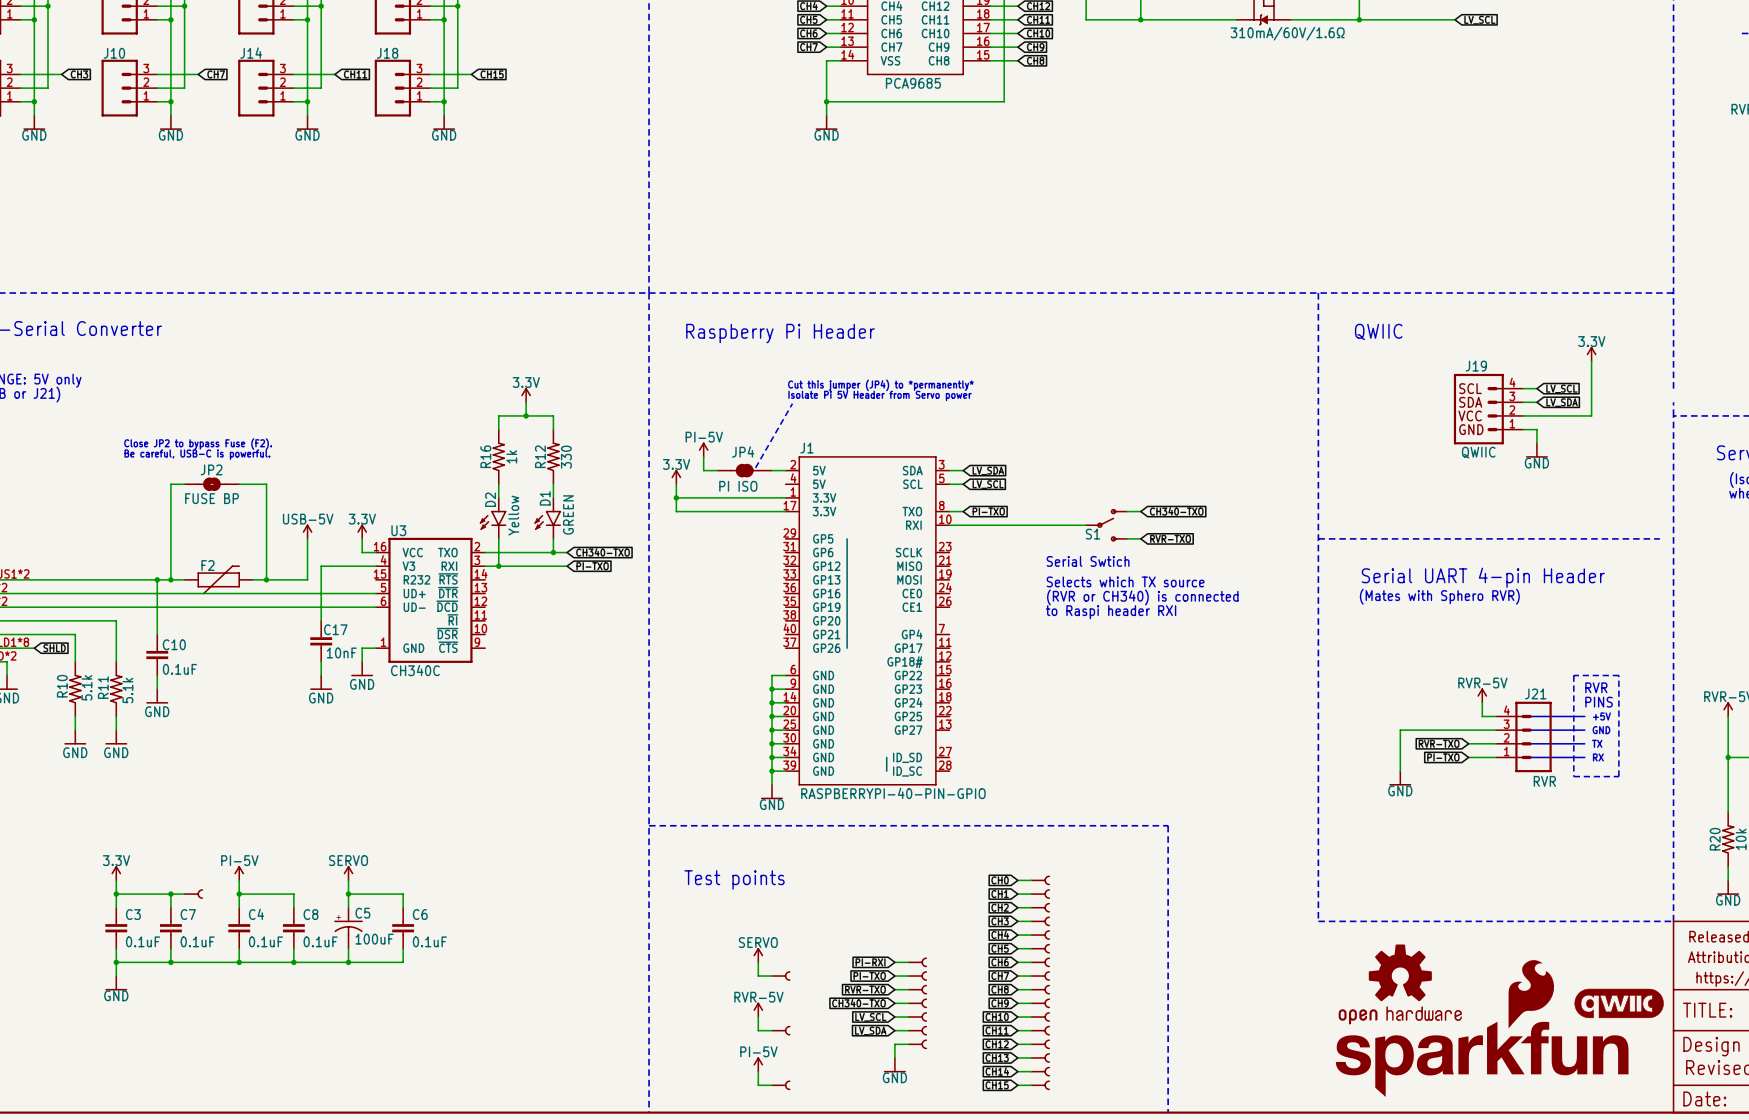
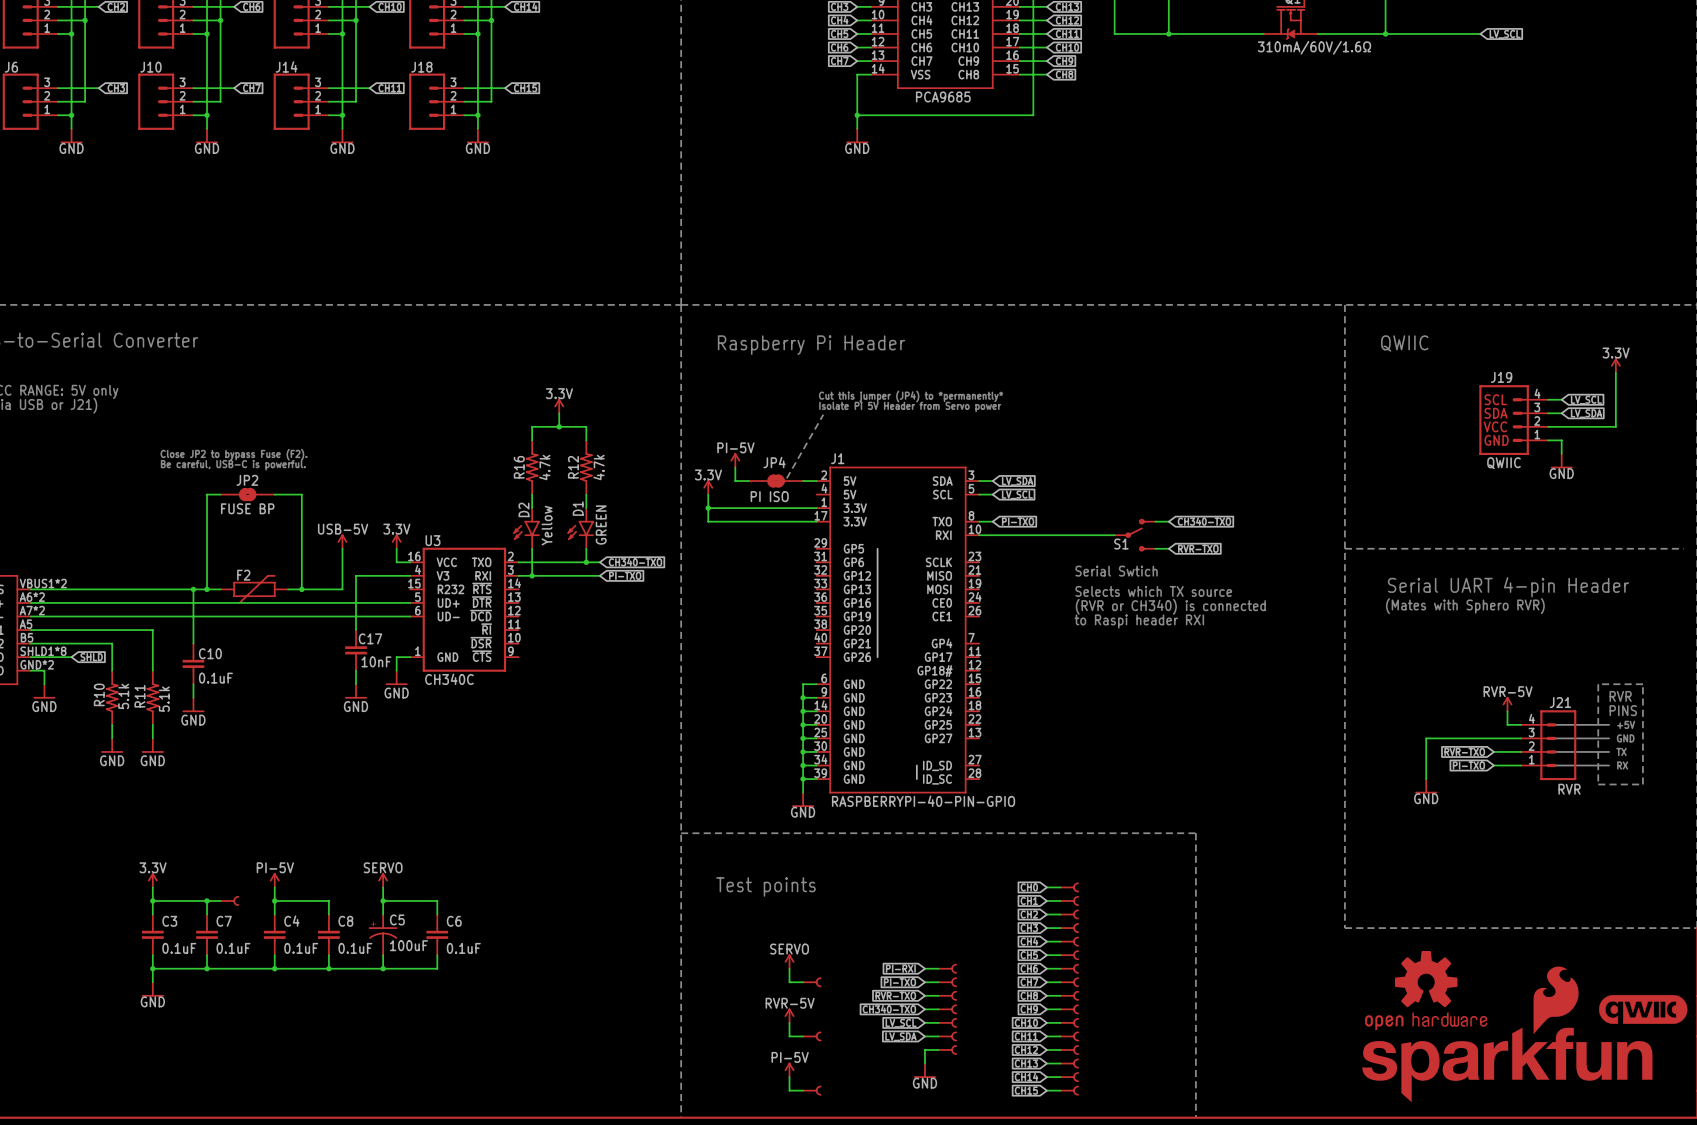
R16 value: 1k (511, 456) -> 4.7k (544, 467)
R12 value: 330 (566, 457) -> 4.7k (598, 467)

